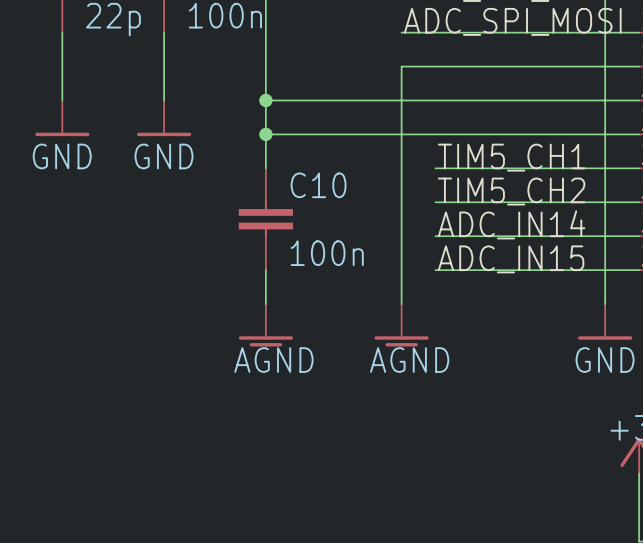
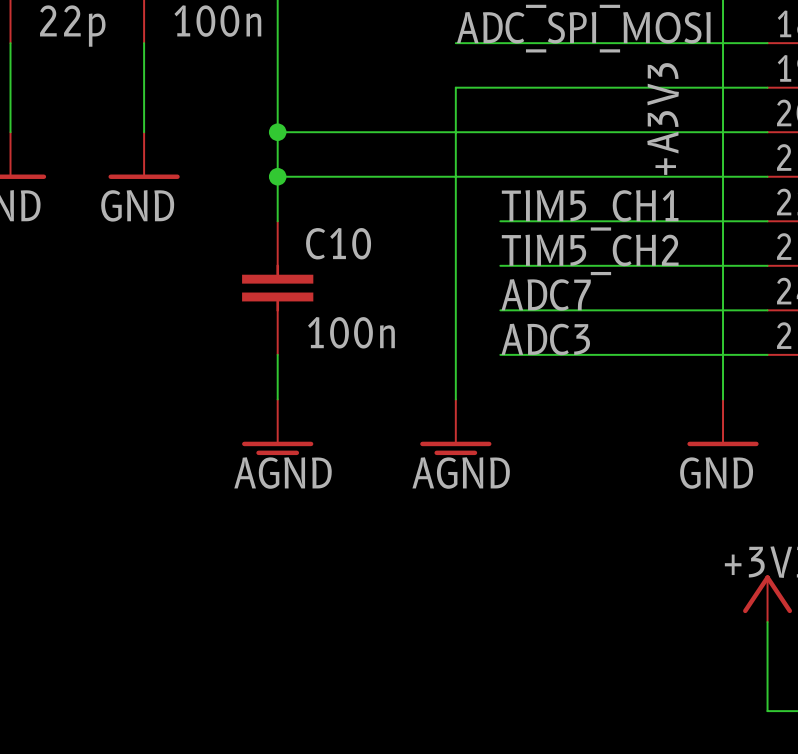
label: none -> +A3V3 (663, 118)
label: ADC_IN14 (511, 224) -> ADC7 (546, 294)
label: ADC_IN15 (511, 259) -> ADC3 (545, 339)

